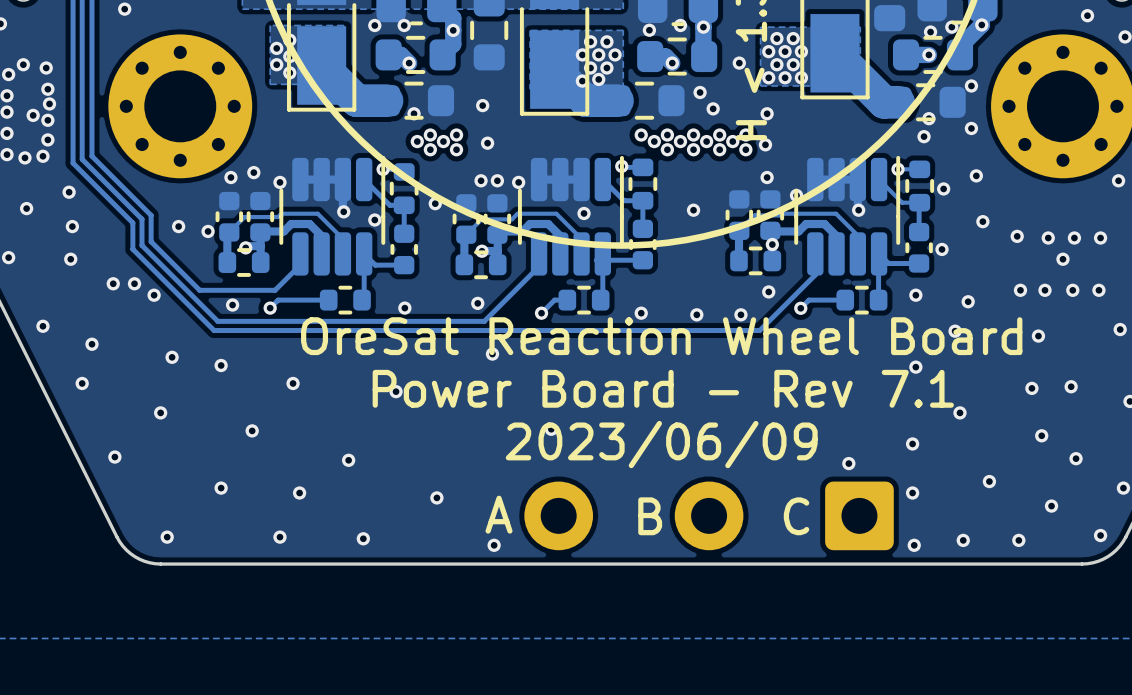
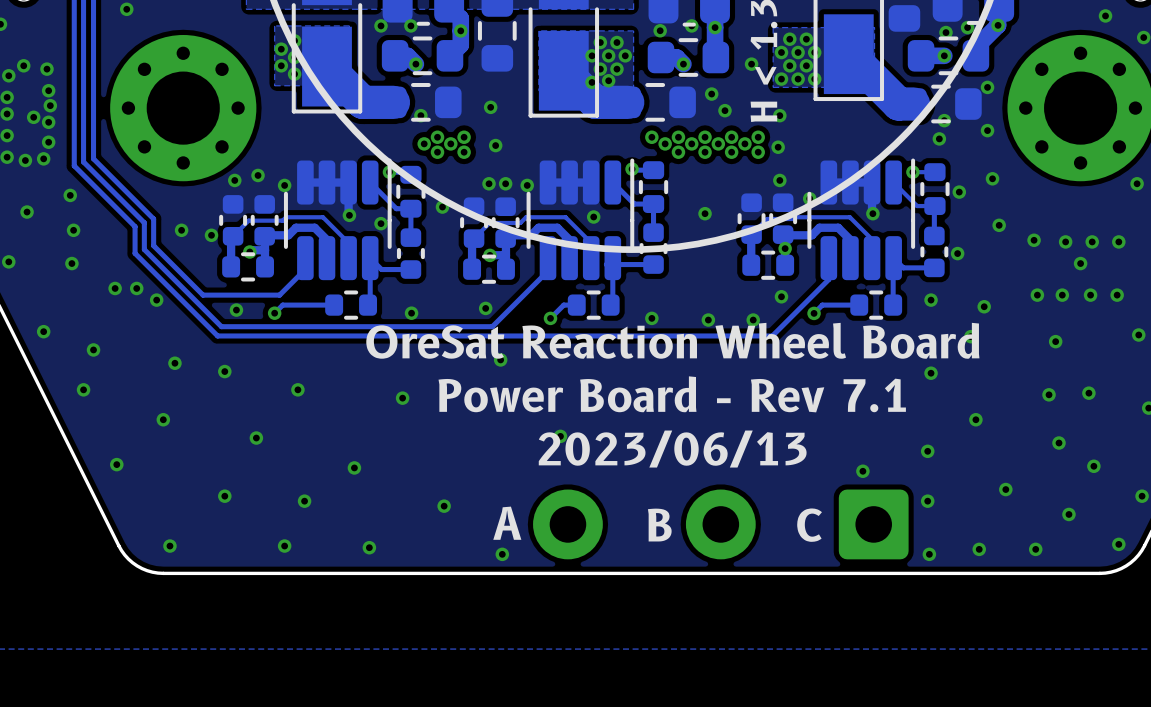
text: 2023/06/09 (661, 444) -> 2023/06/13 (672, 449)

